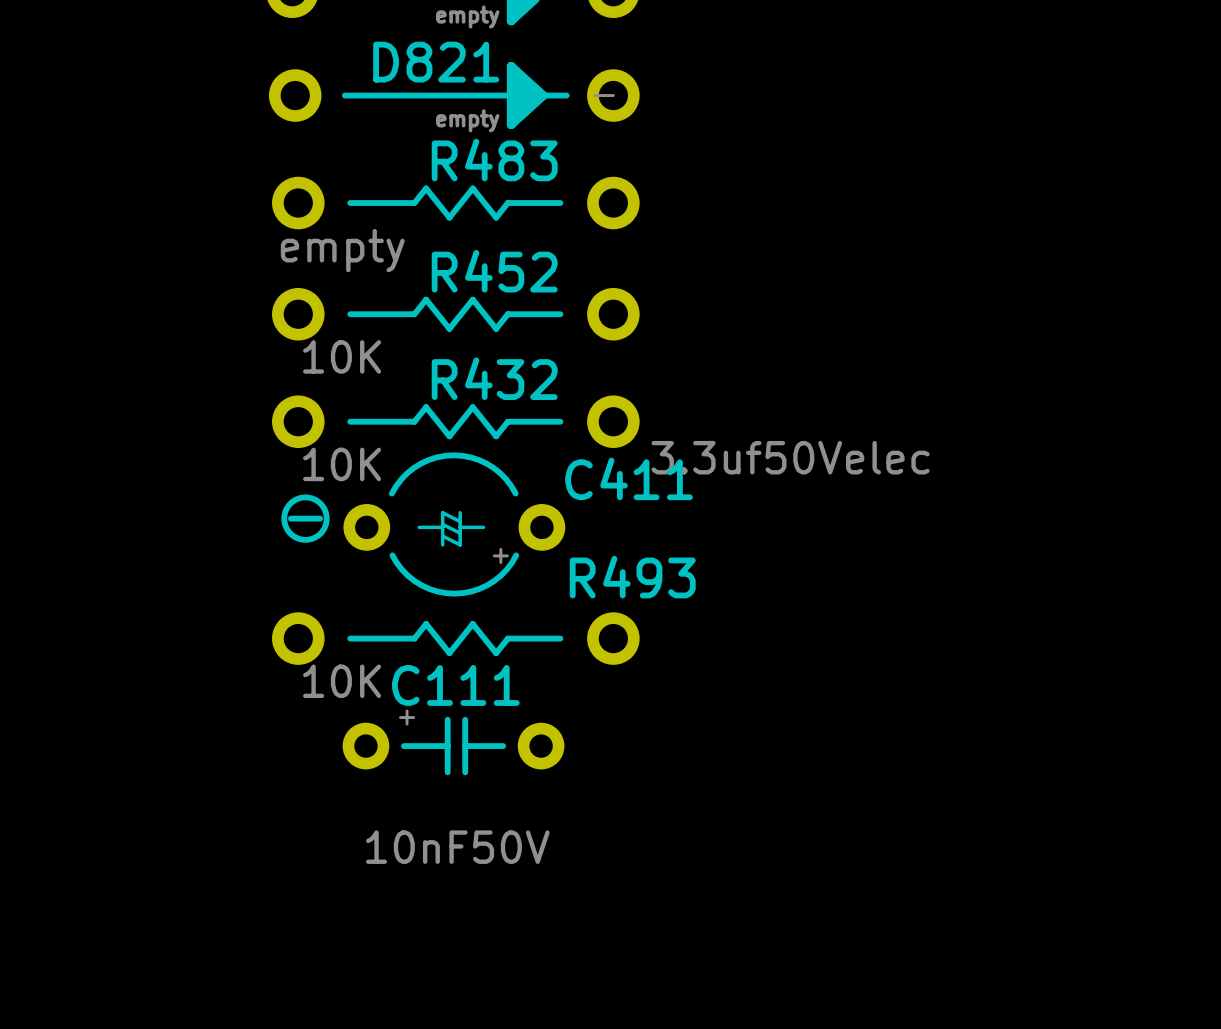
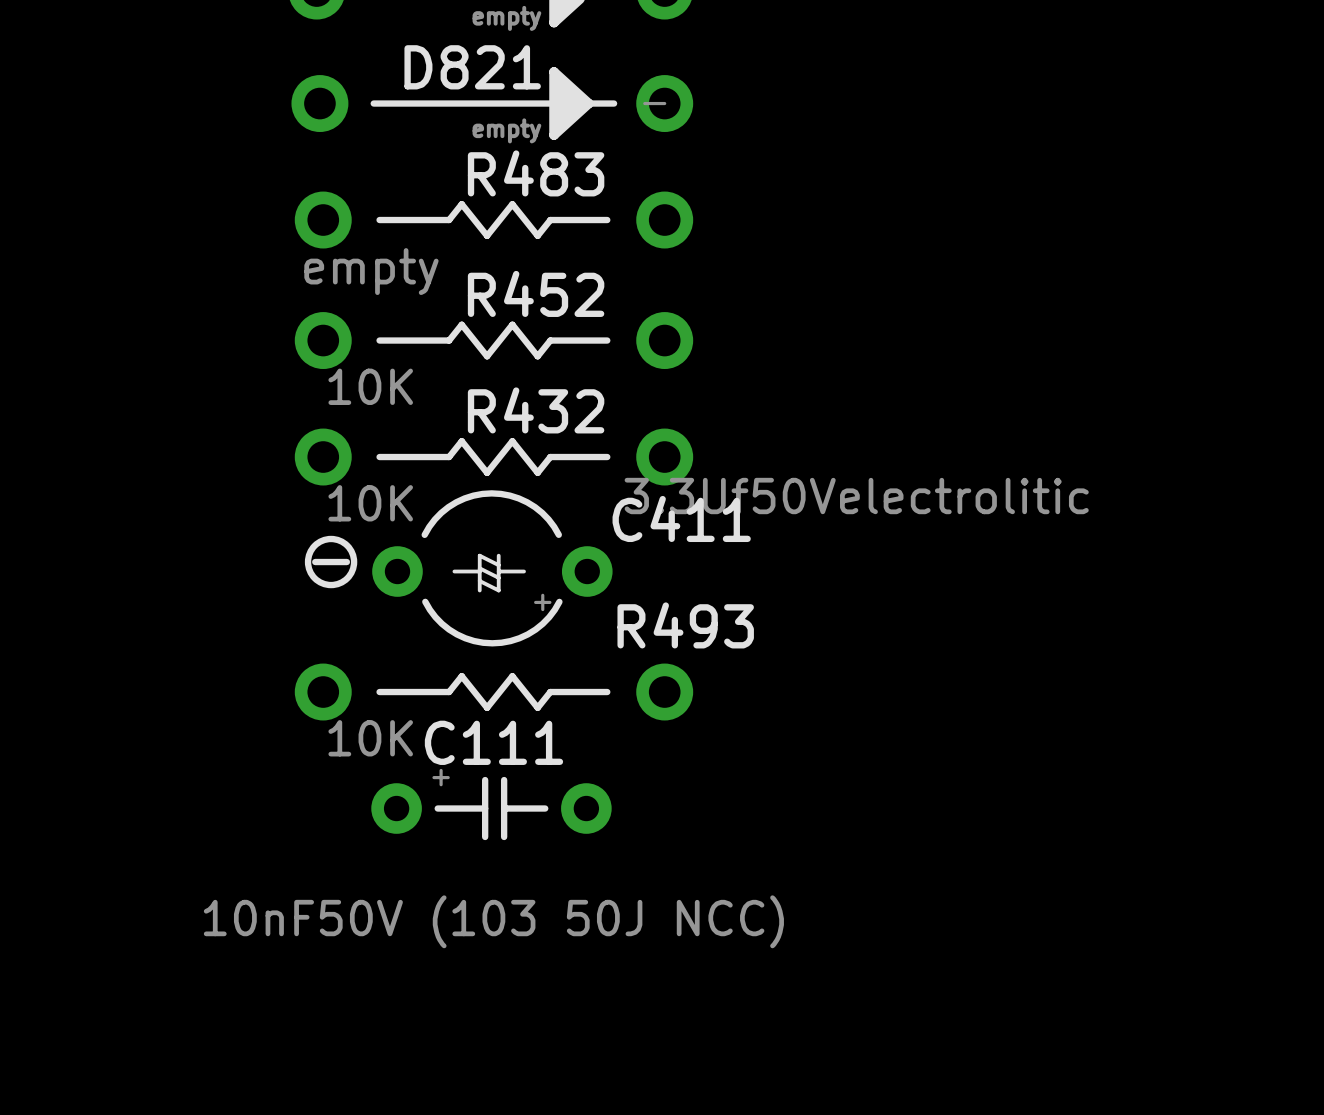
C411 value: 3.3uf50Velec (790, 457) -> 3.3Uf50Velectrolitic (856, 496)
C111 value: 10nF50V (457, 847) -> 10nF50V (103 50J NCC) (493, 921)

